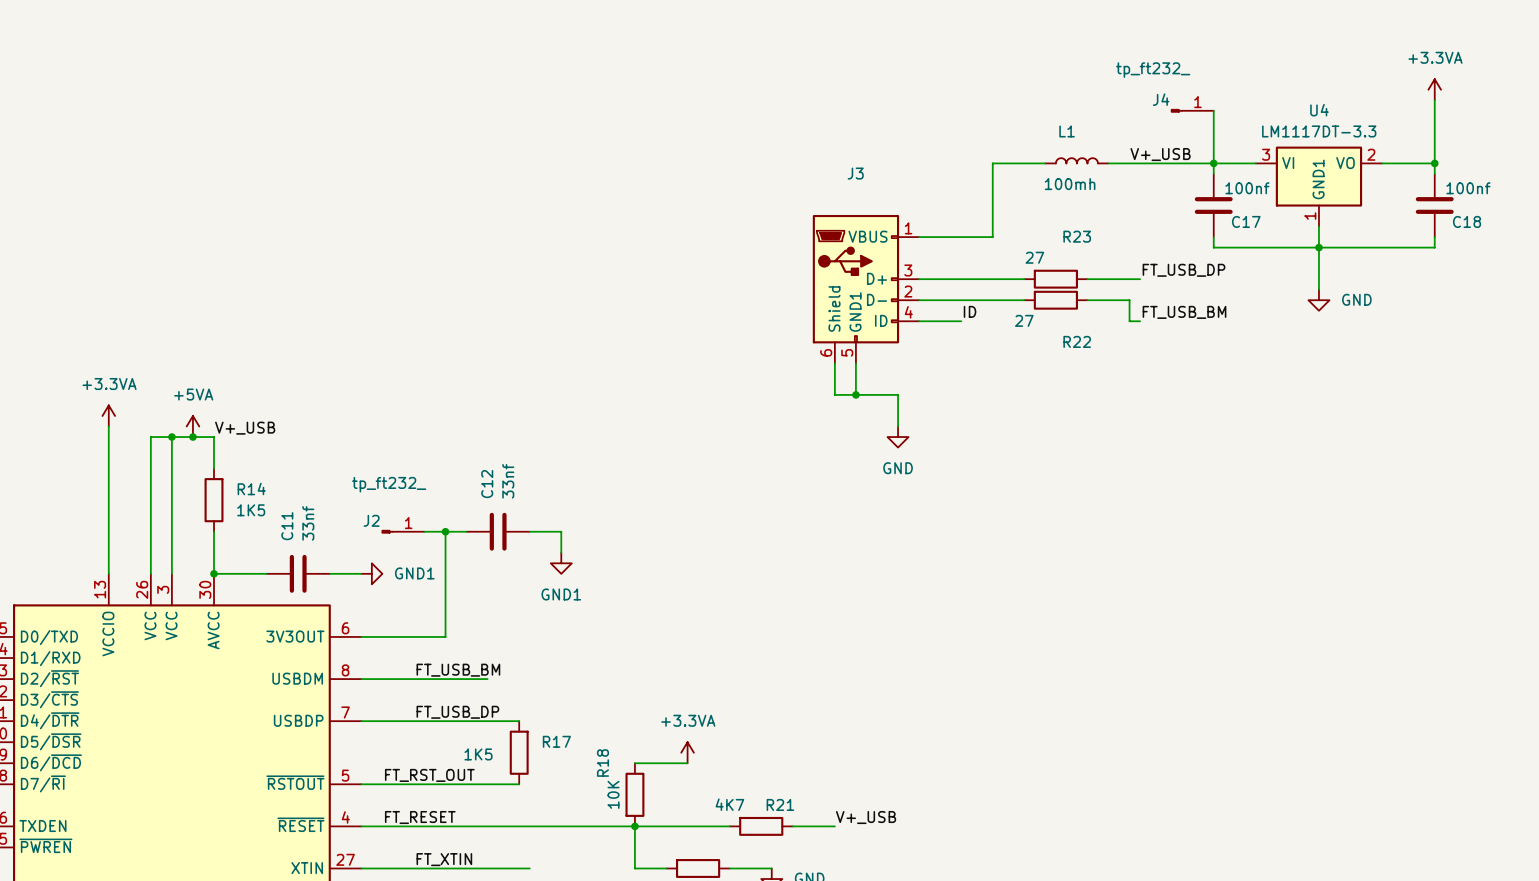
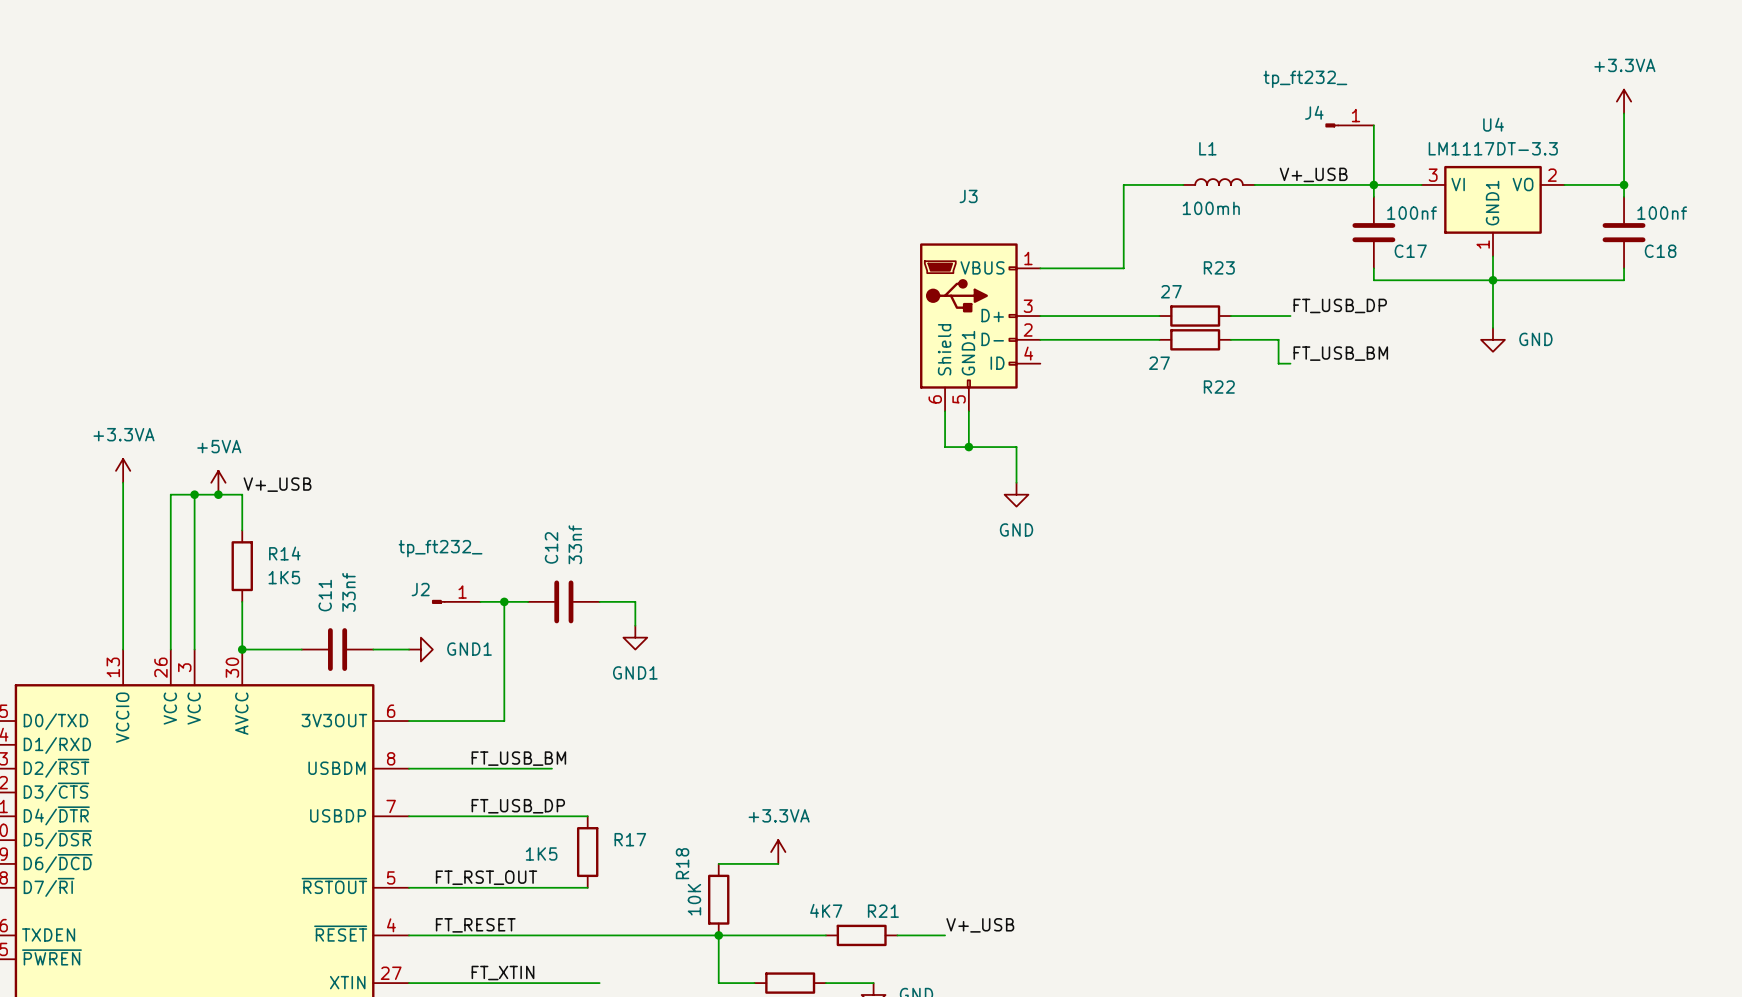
label: ID (970, 311) -> none
wire: (919, 321) (961, 321) -> none

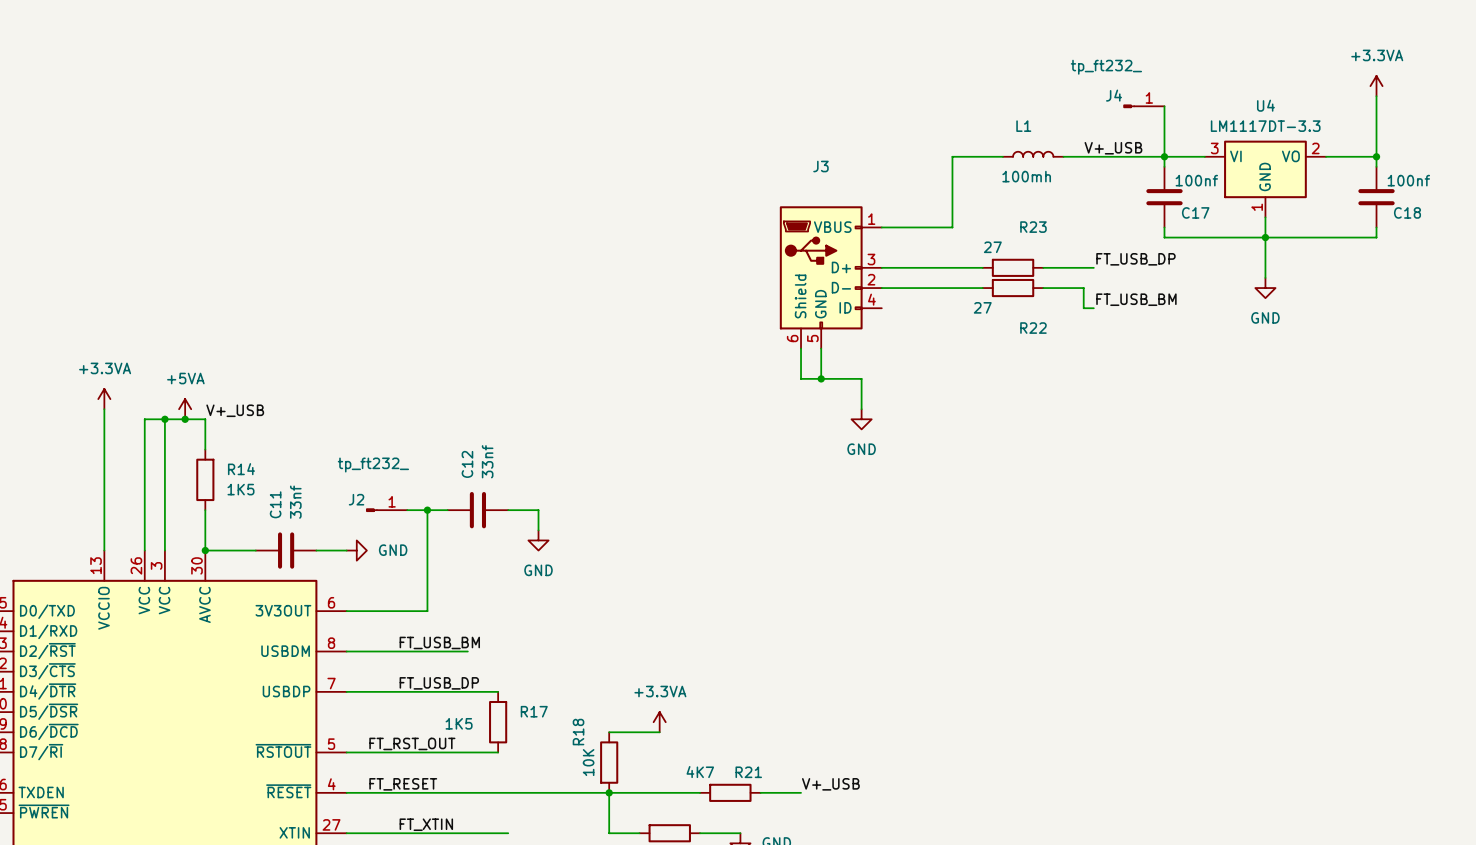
U4 pin name: GND1 (1492, 203) -> GND (1265, 176)
power symbol text position: GND (1535, 339) -> GND (1265, 317)
J3 pin name: GND1 (968, 353) -> GND (820, 304)
power symbol: GND1 (635, 637) -> GND (538, 540)
power symbol: GND1 (420, 649) -> GND (356, 550)

